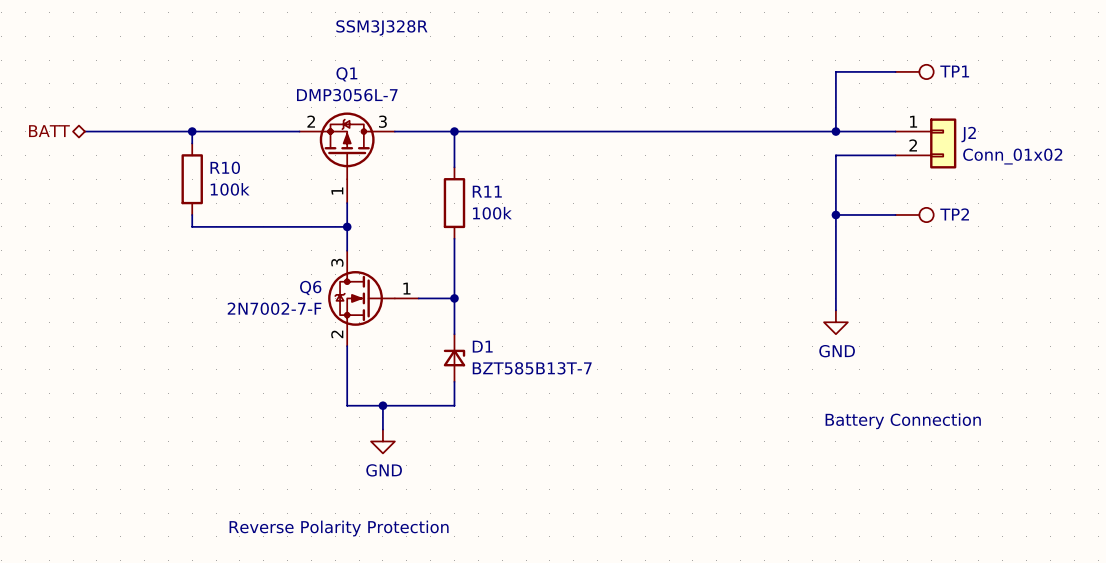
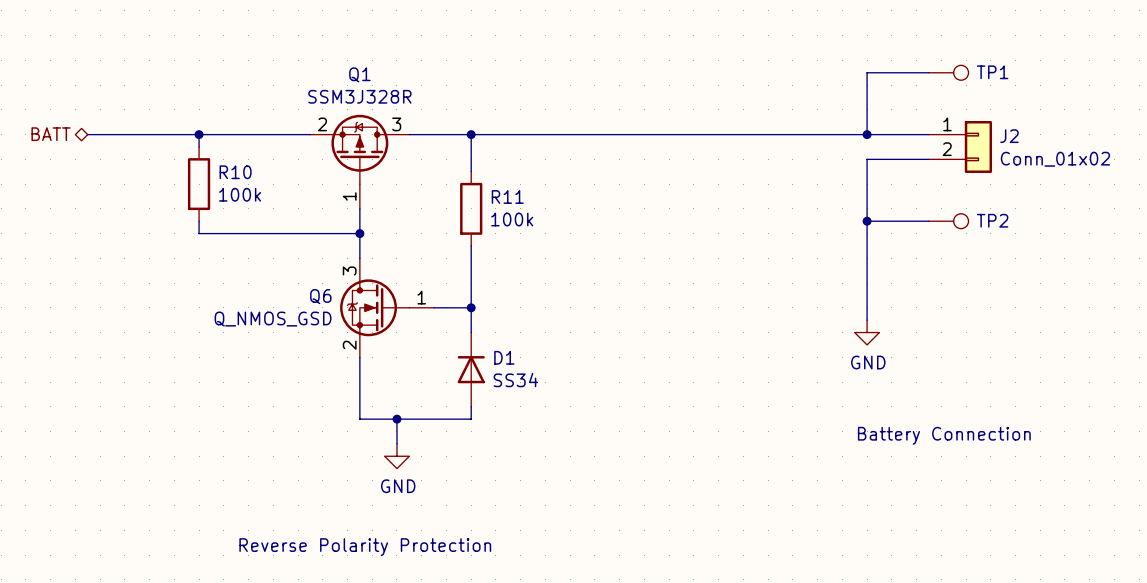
text: SSM3J328R (381, 27) -> none
Q1 text: DMP3056L-7 (347, 95) -> none
Q1 value: none -> SSM3J328R (359, 96)
Q6 value: 2N7002-7-F (274, 308) -> Q_NMOS_GSD (273, 319)
D1 symbol: [443, 334, 466, 382] -> [457, 332, 485, 407]
D1 value: BZT585B13T-7 (532, 368) -> SS34 (515, 380)

